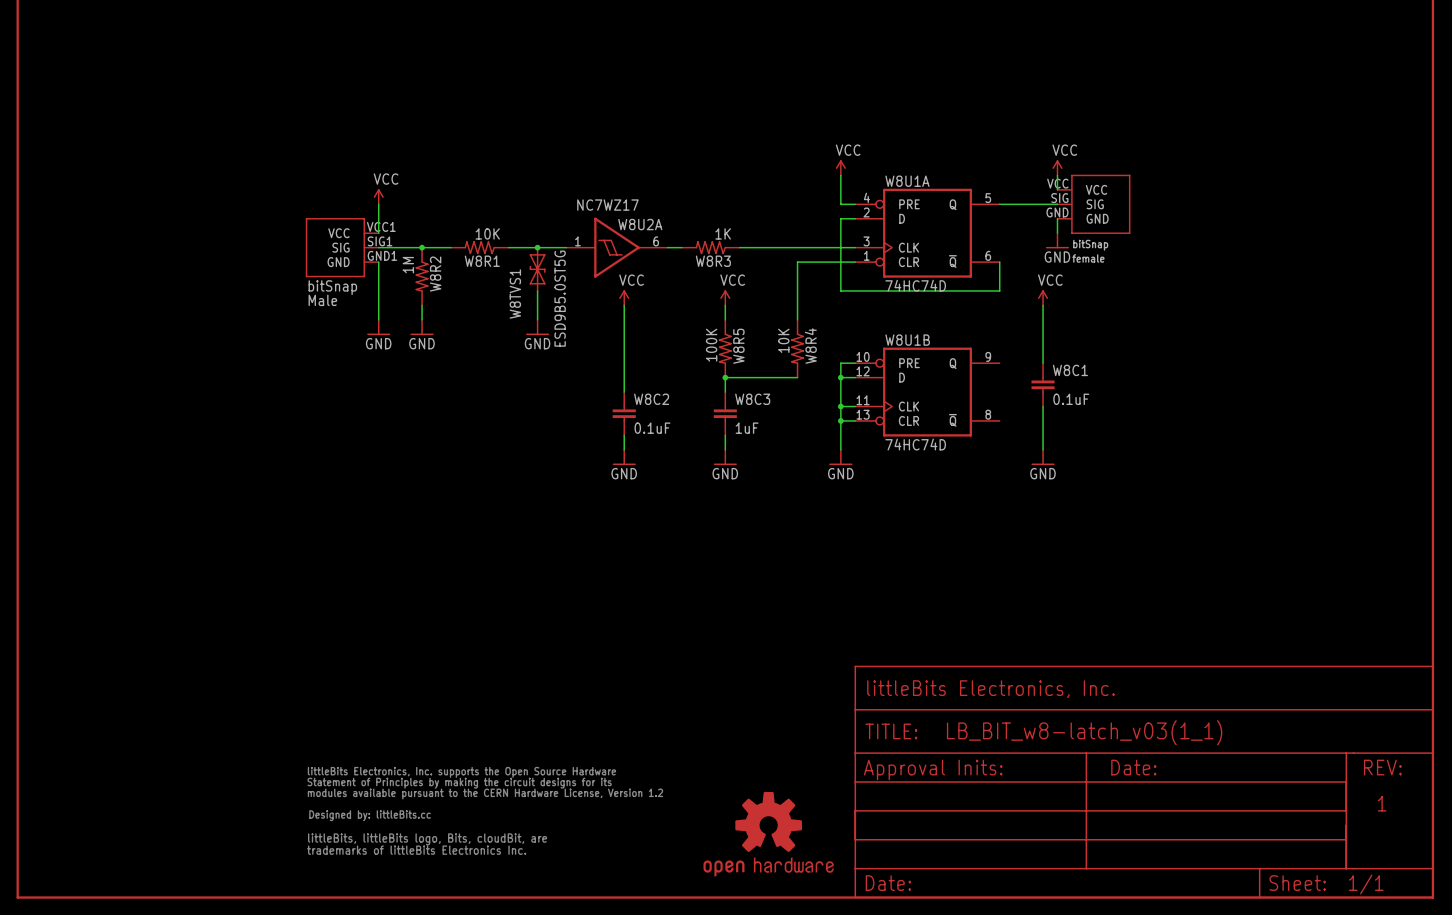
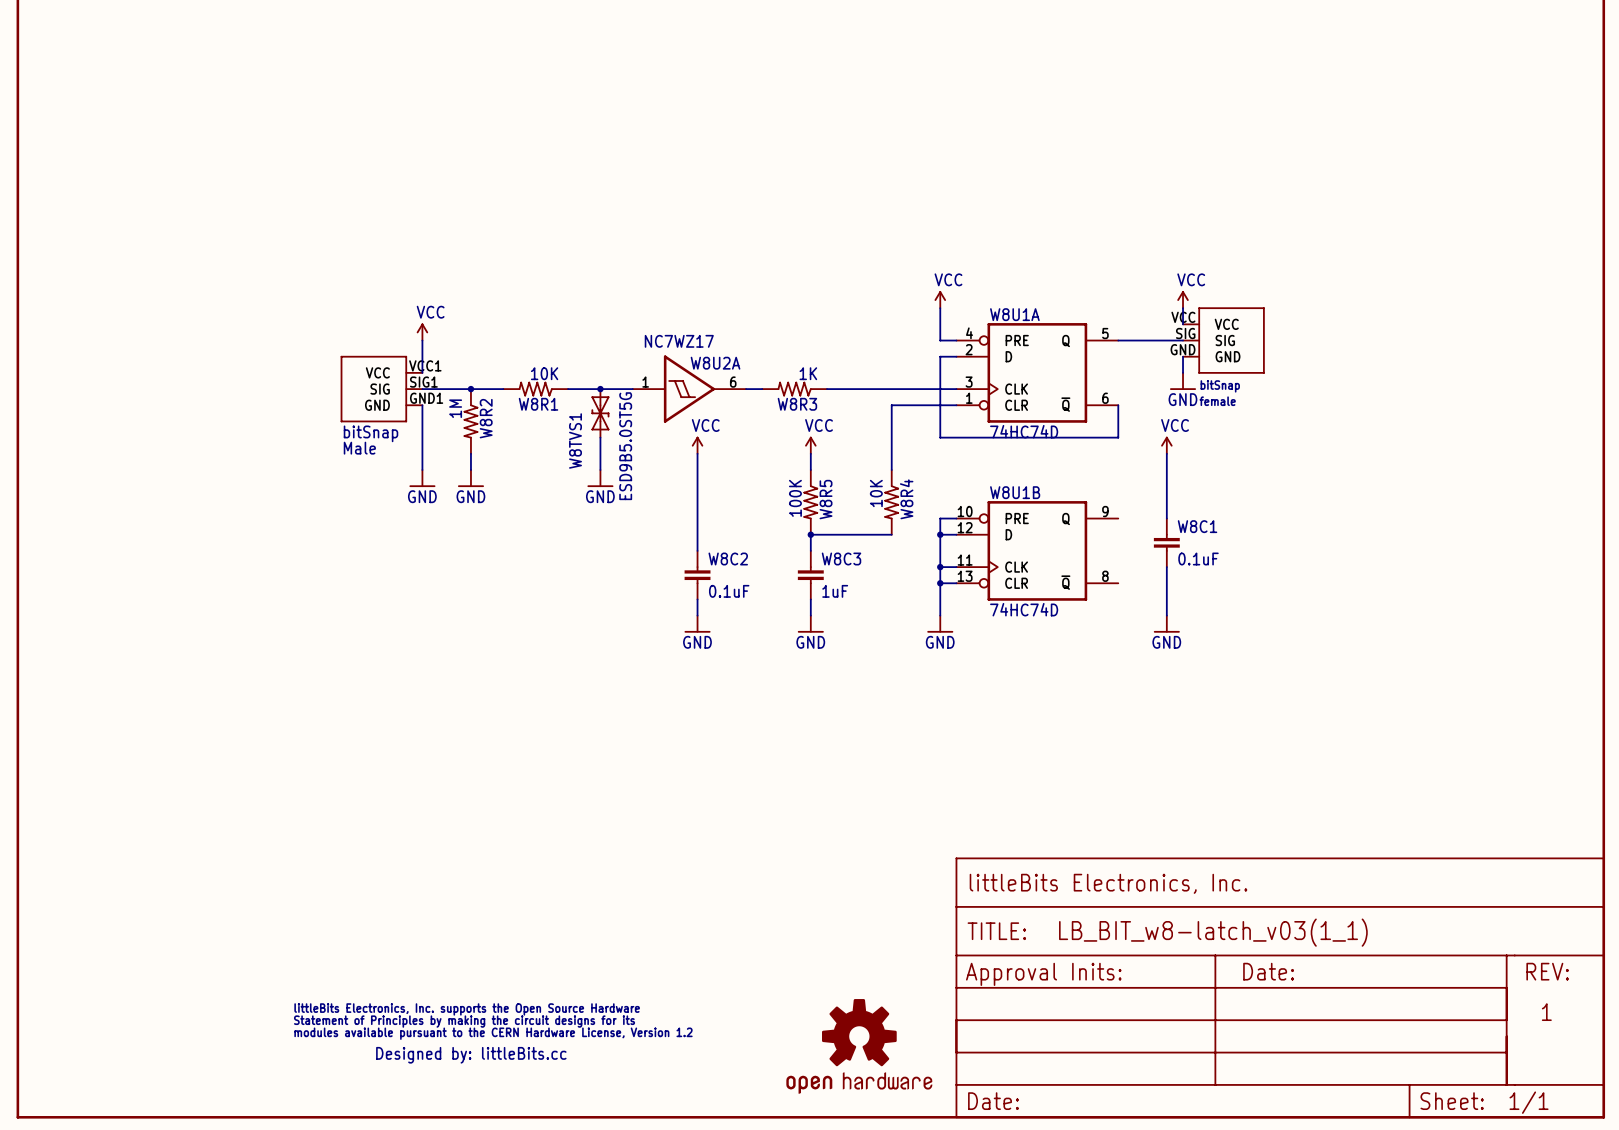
part: (485, 810) -> none
part: none -> (493, 1033)

